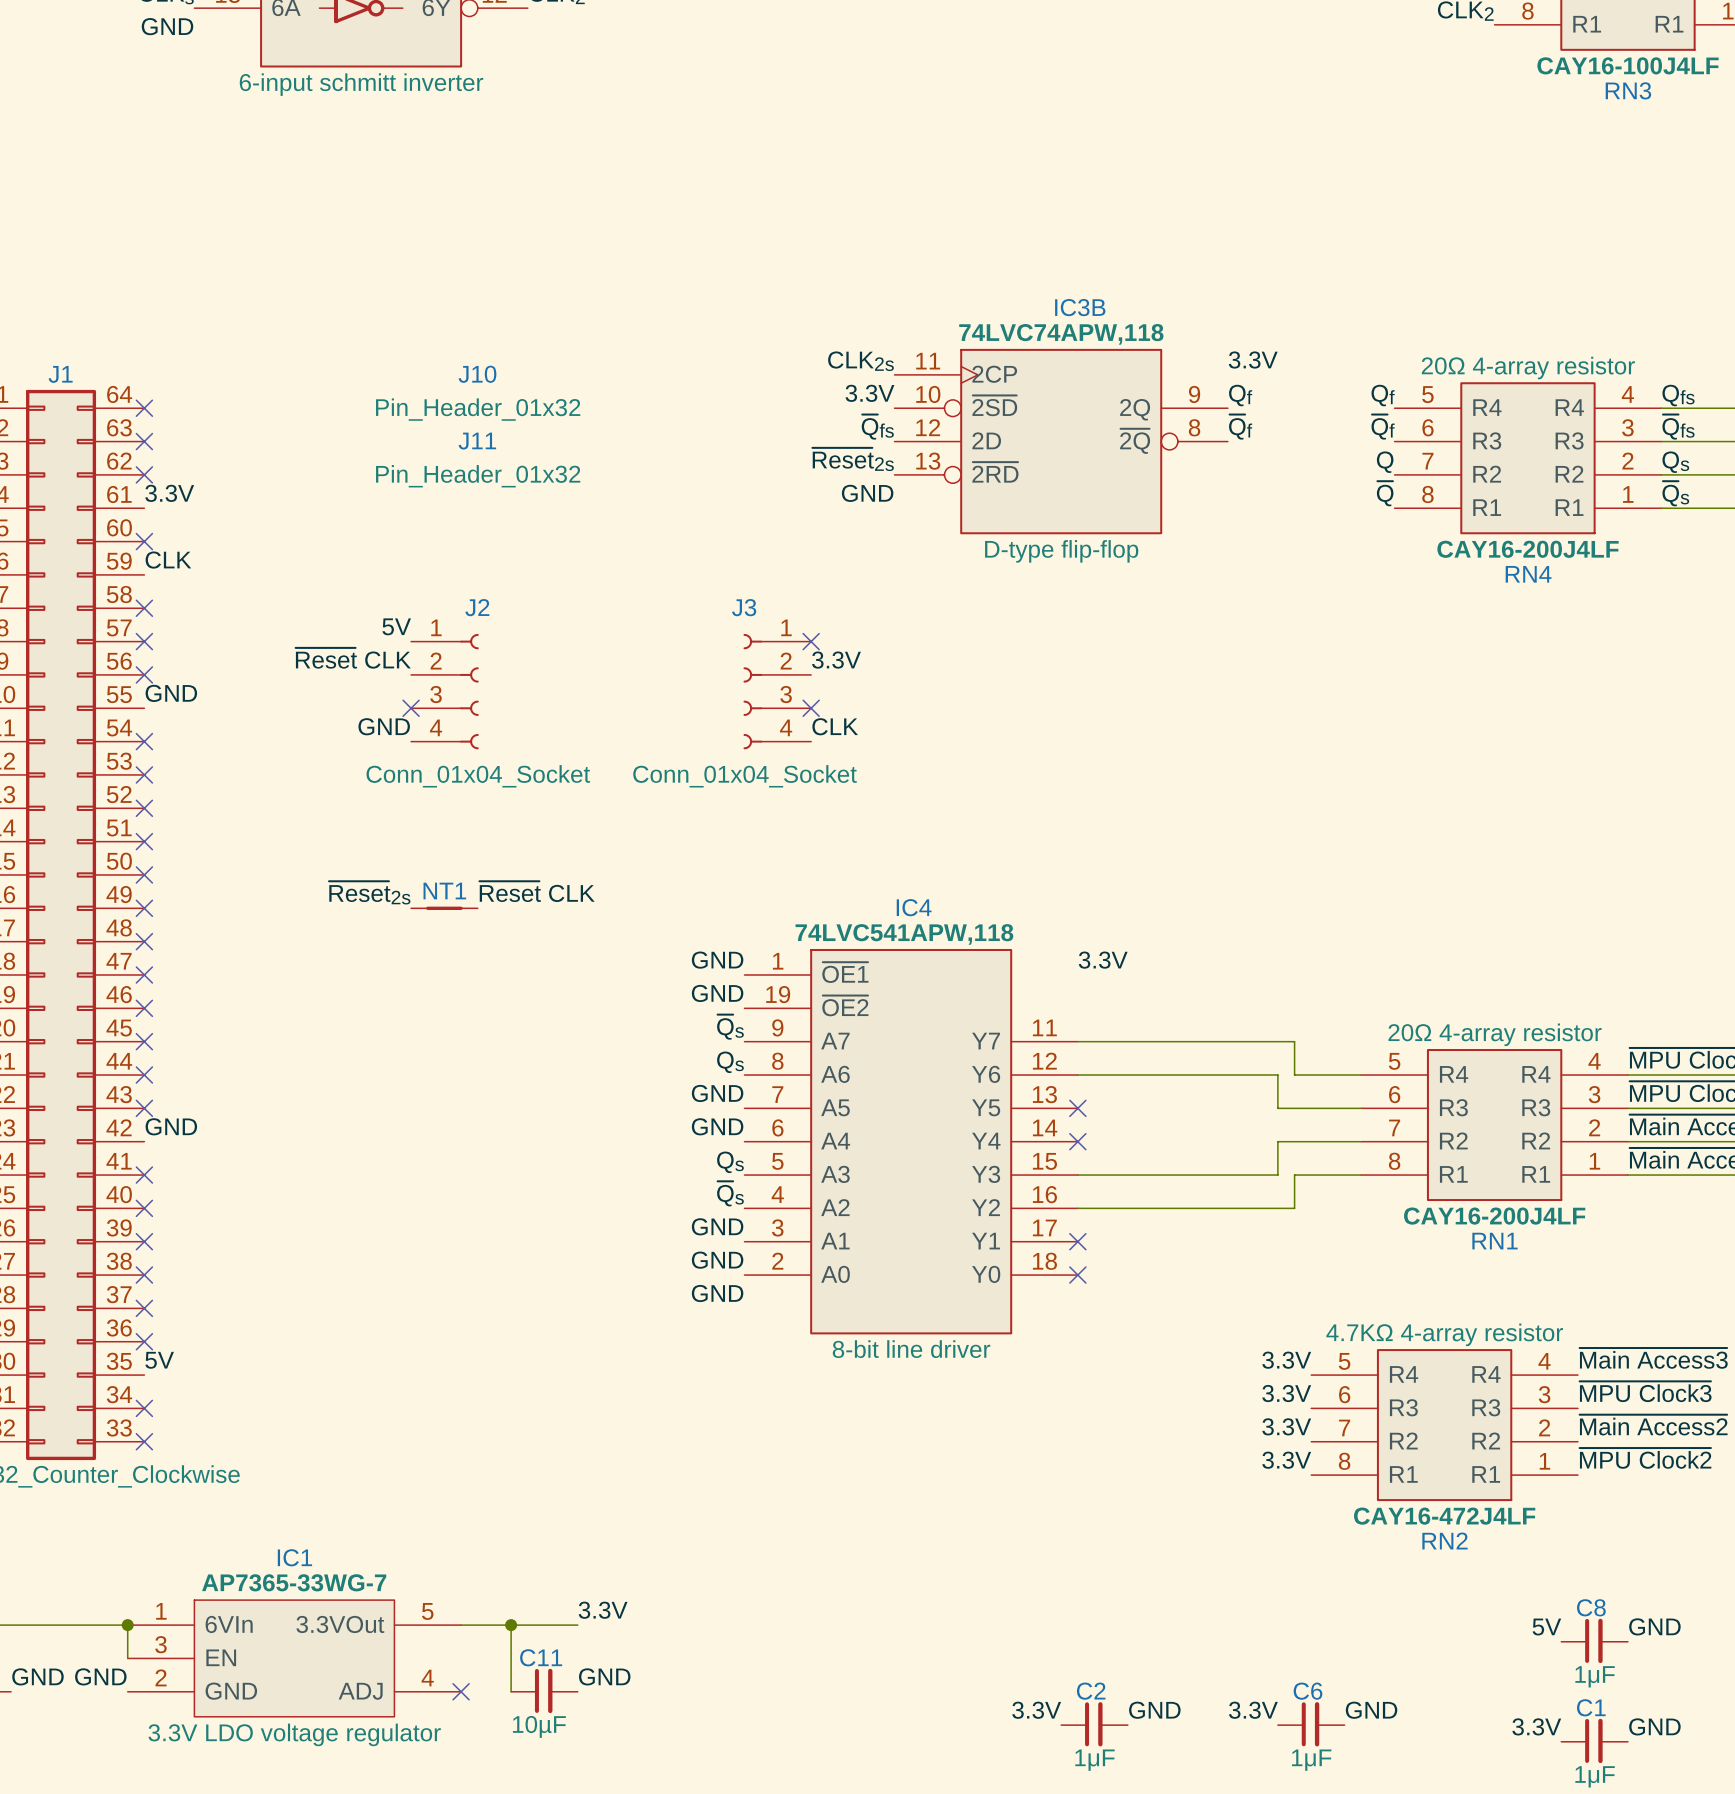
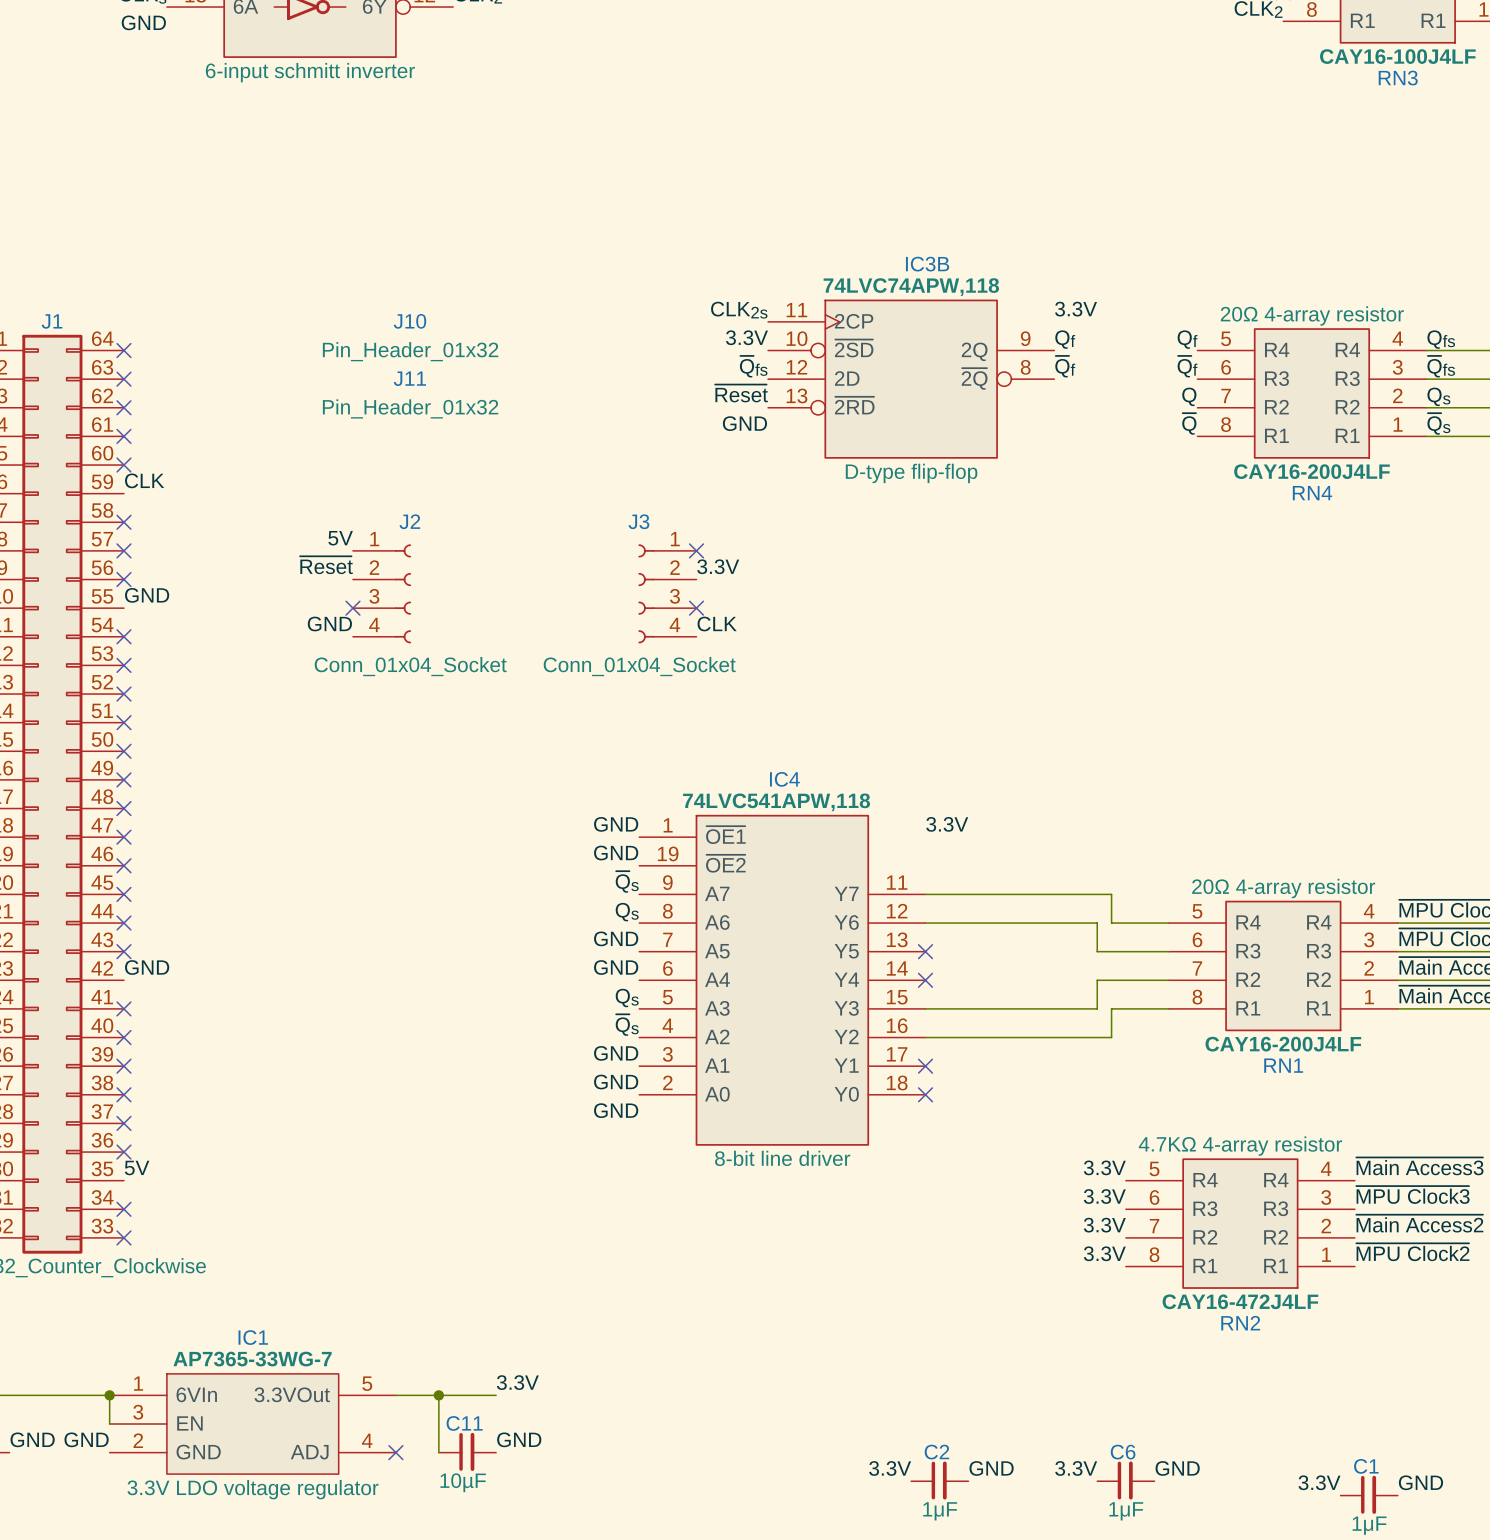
label: ~{Reset}2s (853, 459) -> ~{Reset} (741, 393)
label: 3.3V (169, 493) -> none
no-connect mark: none -> (123, 436)
label: ~{Reset} CLK (353, 658) -> ~{Reset} (326, 565)
label: ~{Reset} CLK (537, 891) -> none
label: ~{Reset}2s (369, 892) -> none
NT1: (444, 908) -> none
label: GND (1654, 1626) -> none
label: 5V (1546, 1627) -> none
C8: 1μF (1594, 1640) -> none

